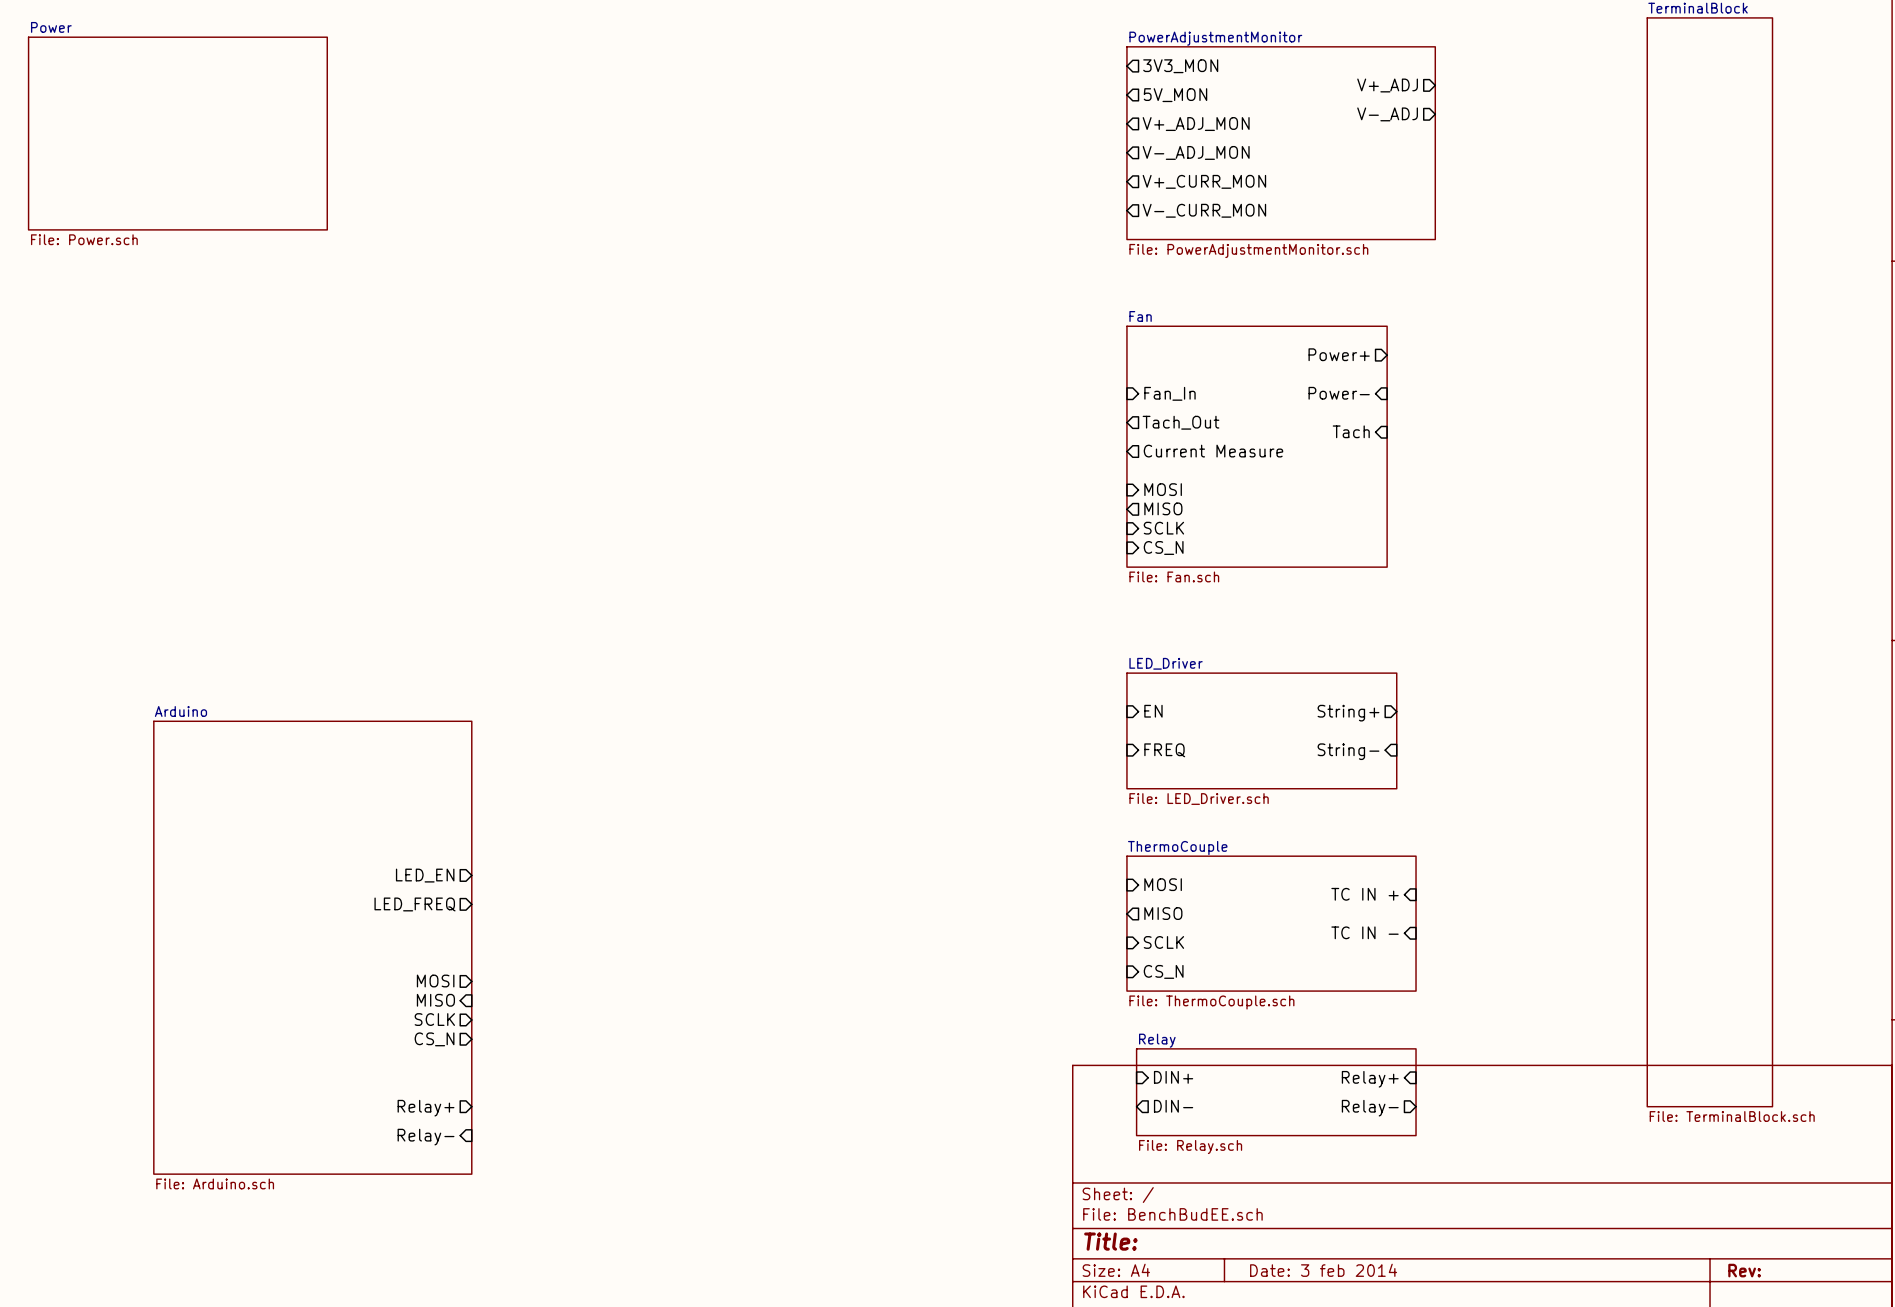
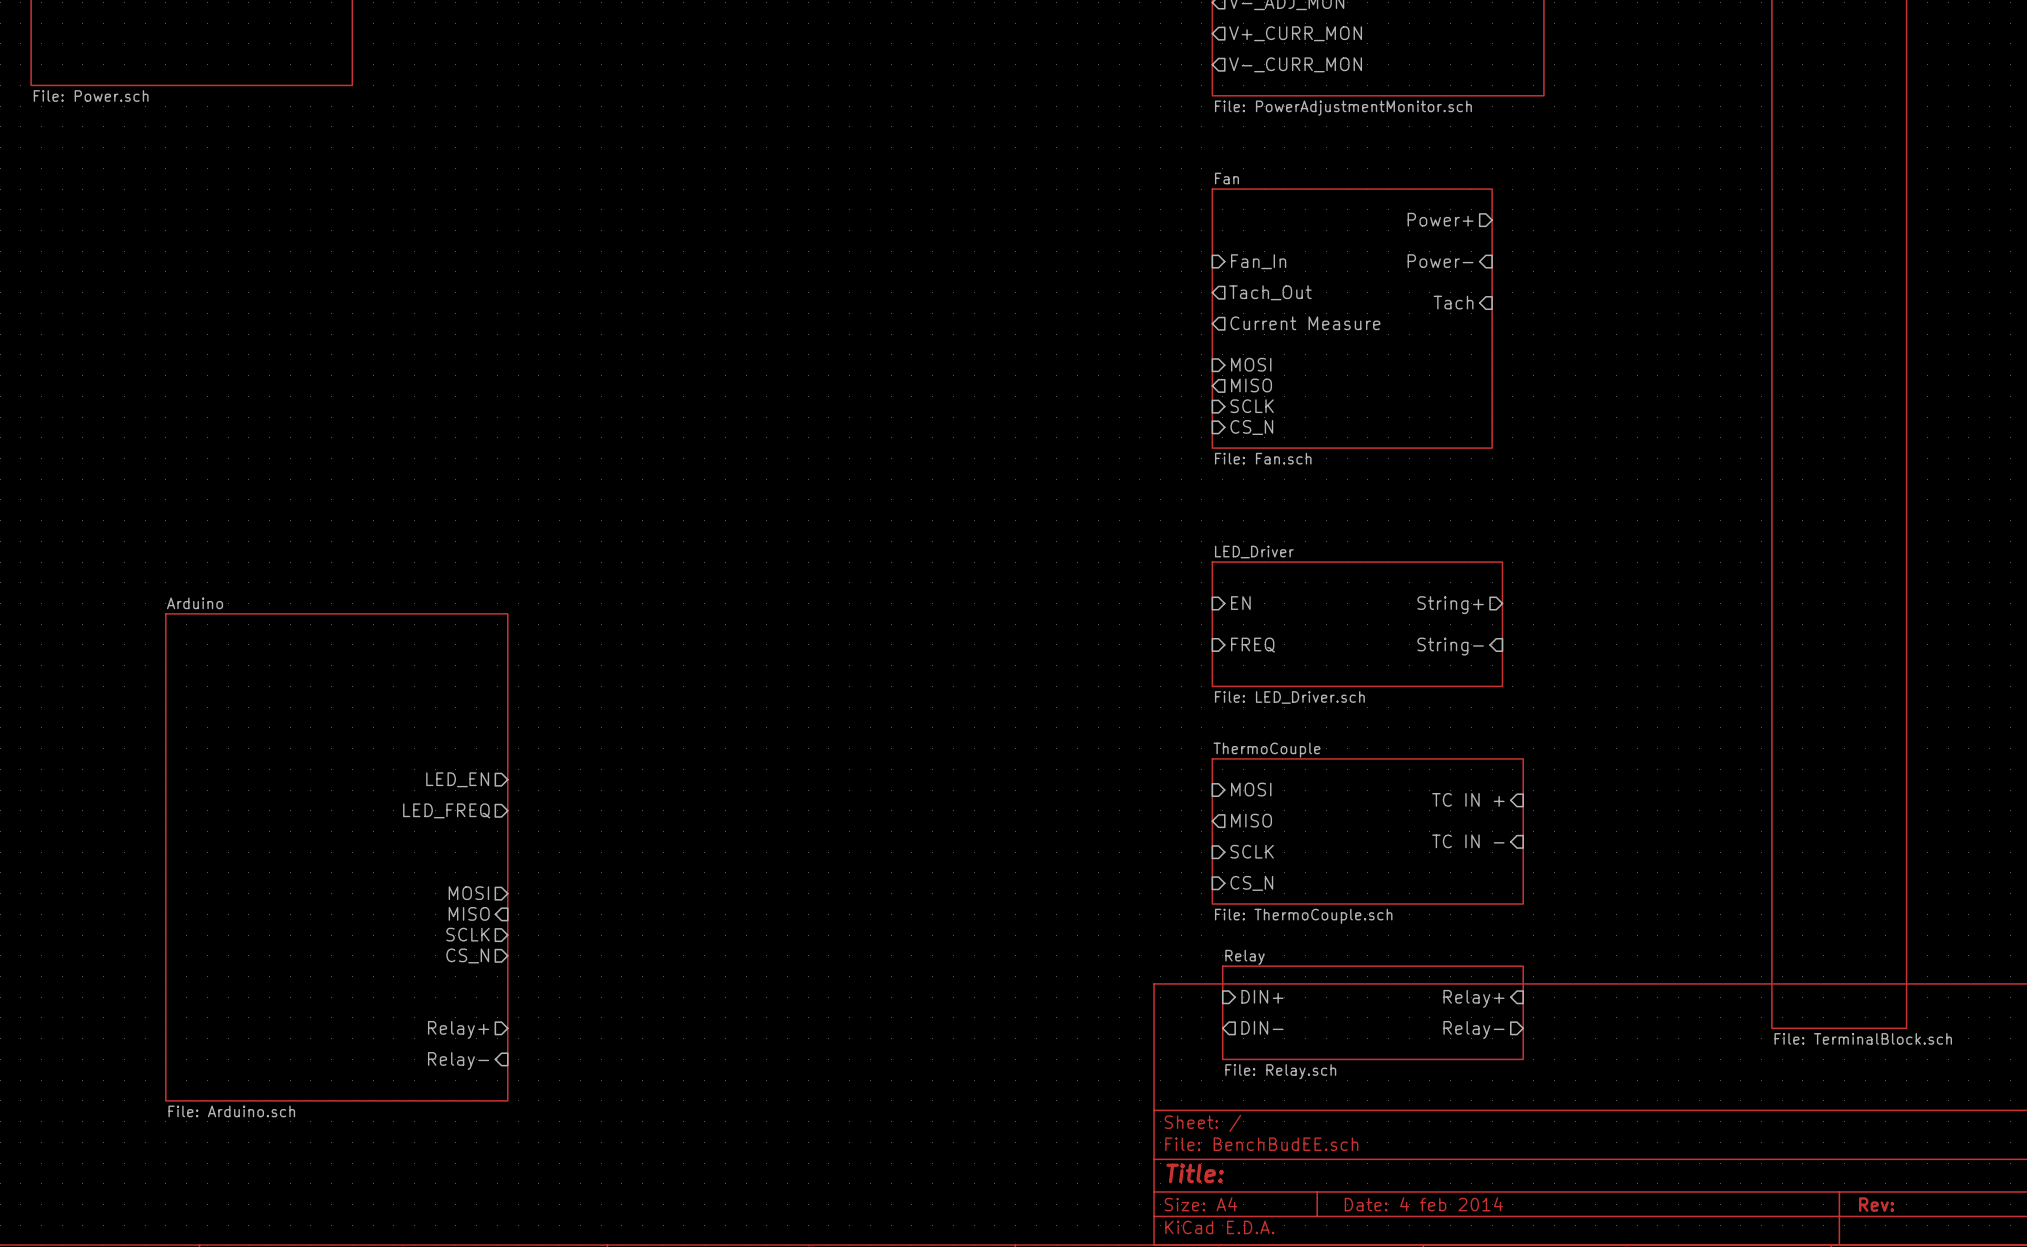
title block: Date: 3 feb 2014 (1323, 1270) -> Date: 4 feb 2014 (1423, 1204)

